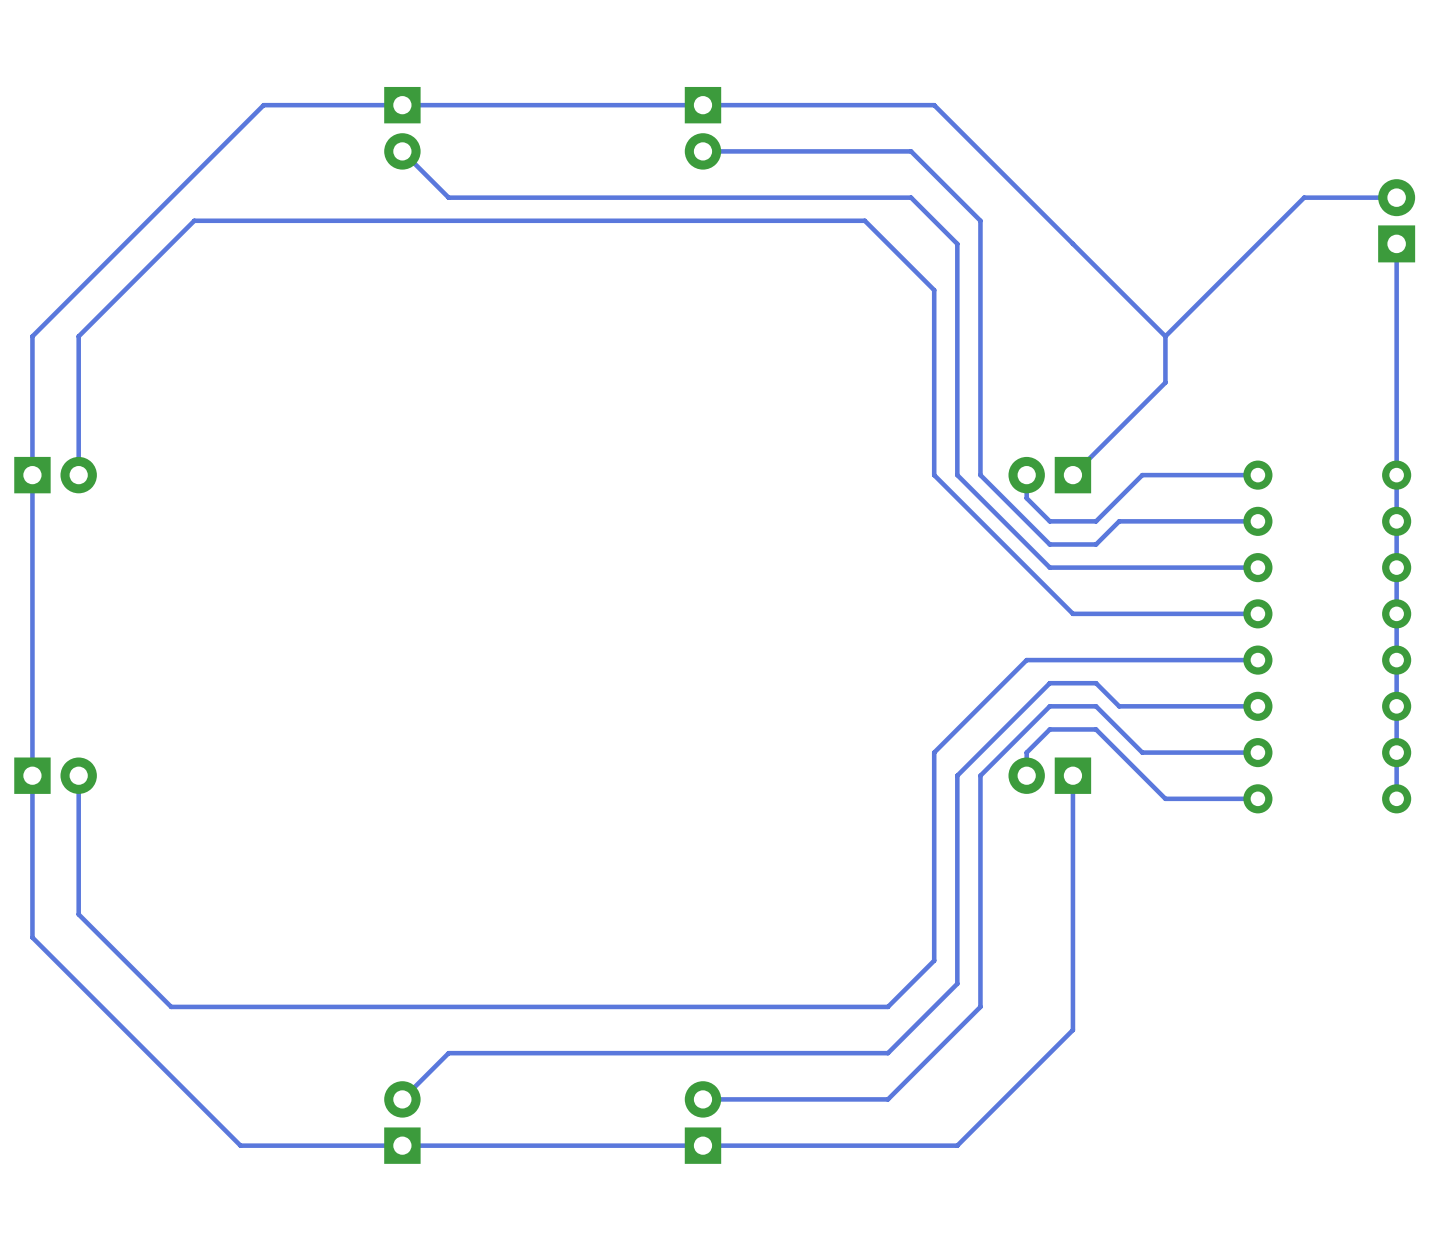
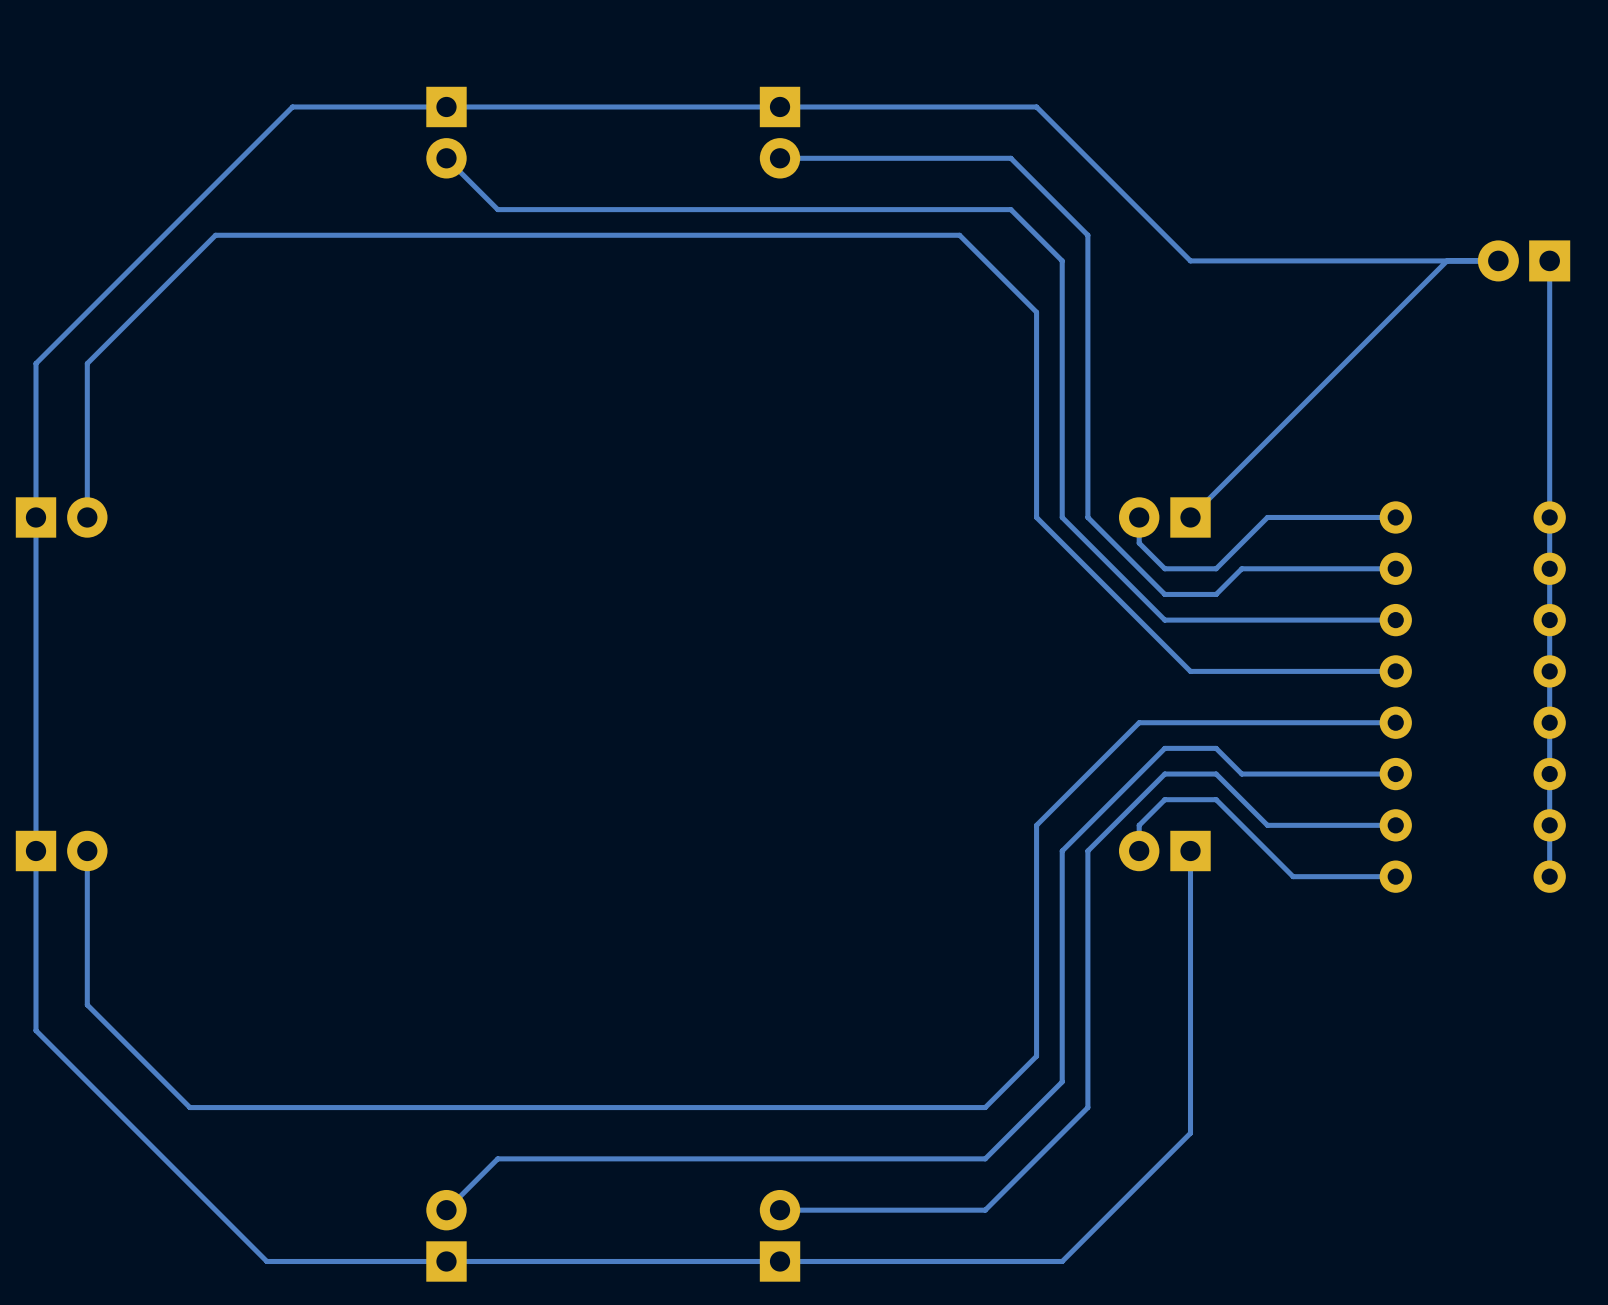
track: (1396, 197) (1304, 197) (1165, 336) -> none
part rotation: 0° (1396, 220) -> 90° counterclockwise (1524, 260)
track: (1072, 243) (1165, 336) -> (1190, 260) (1498, 260)
track: (1165, 336) (1165, 382) -> (1447, 260) (1293, 414)

